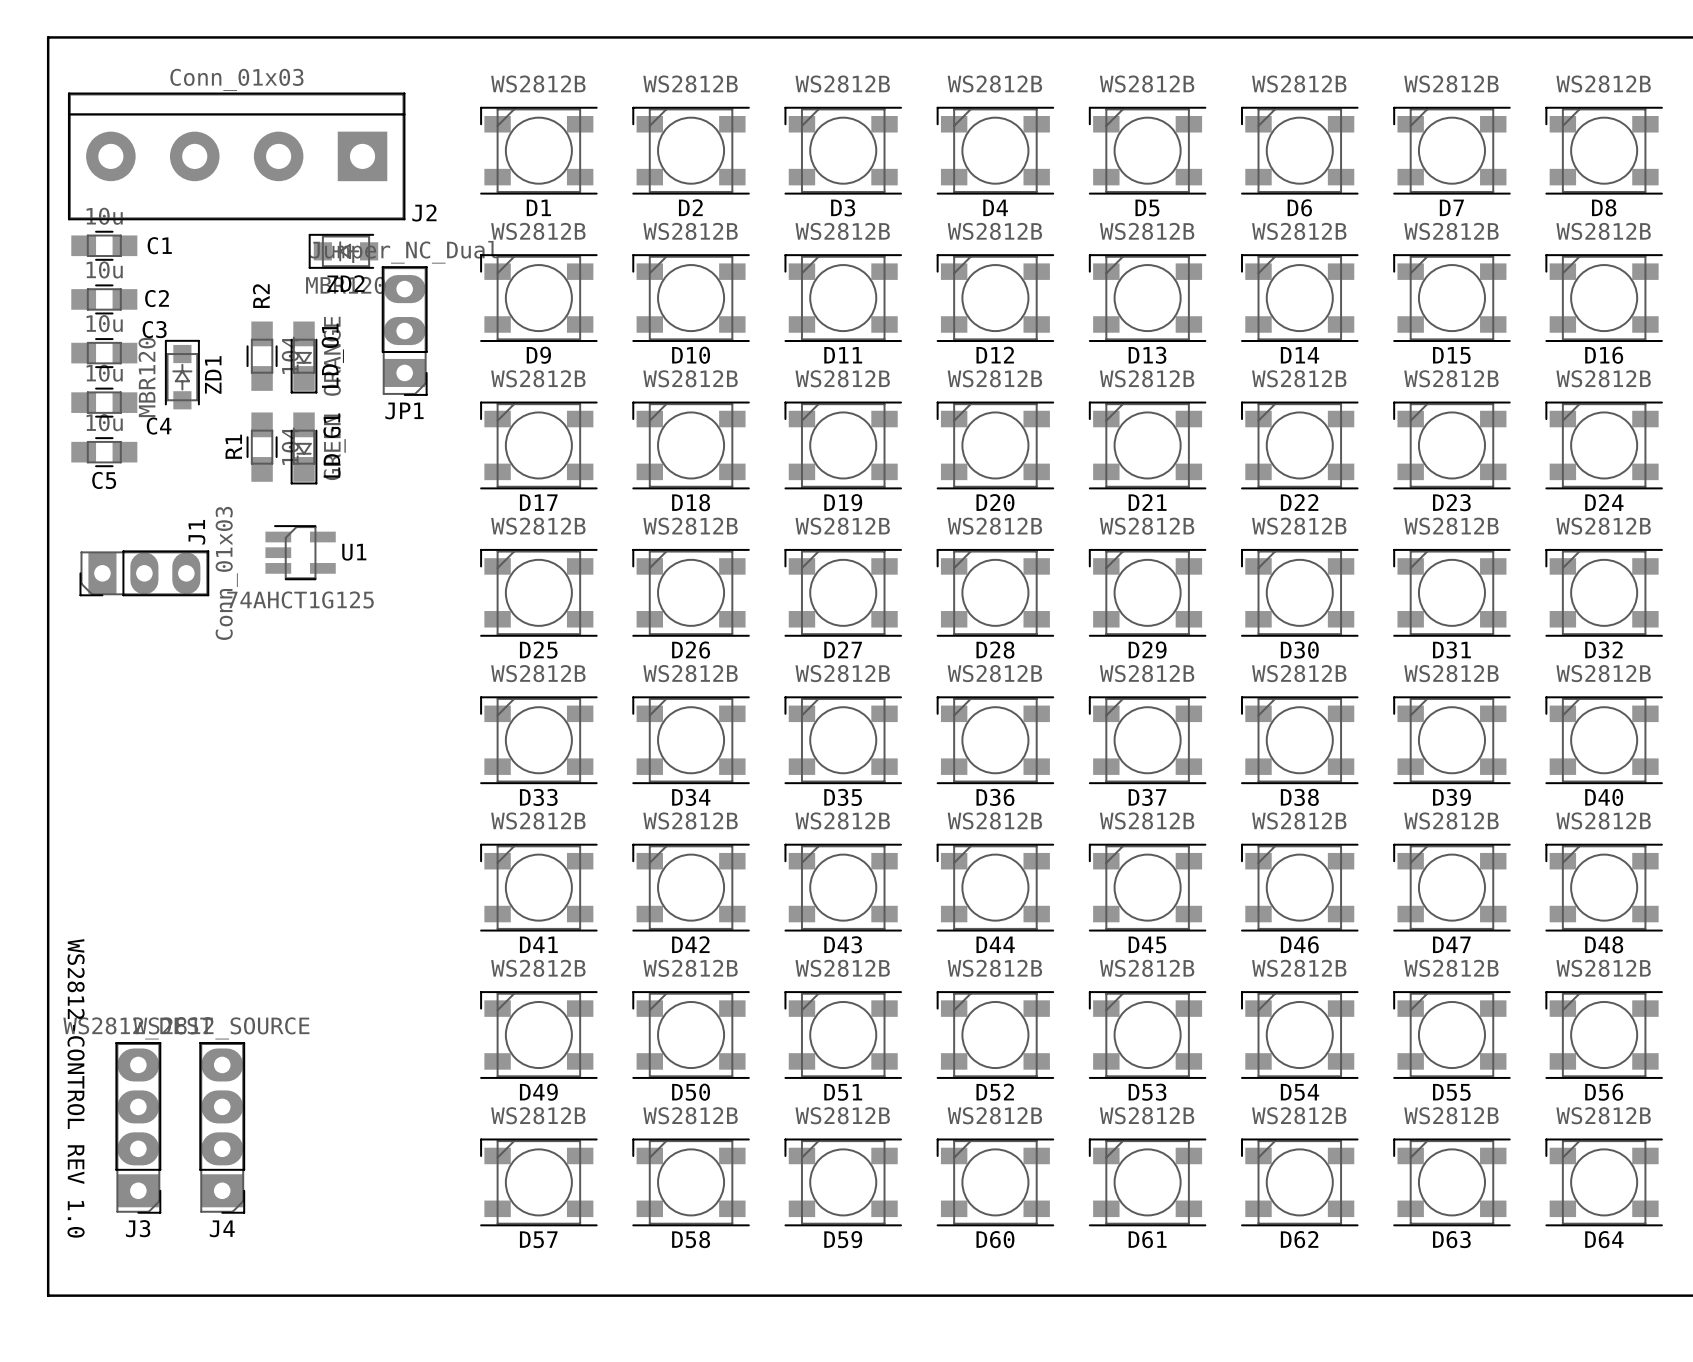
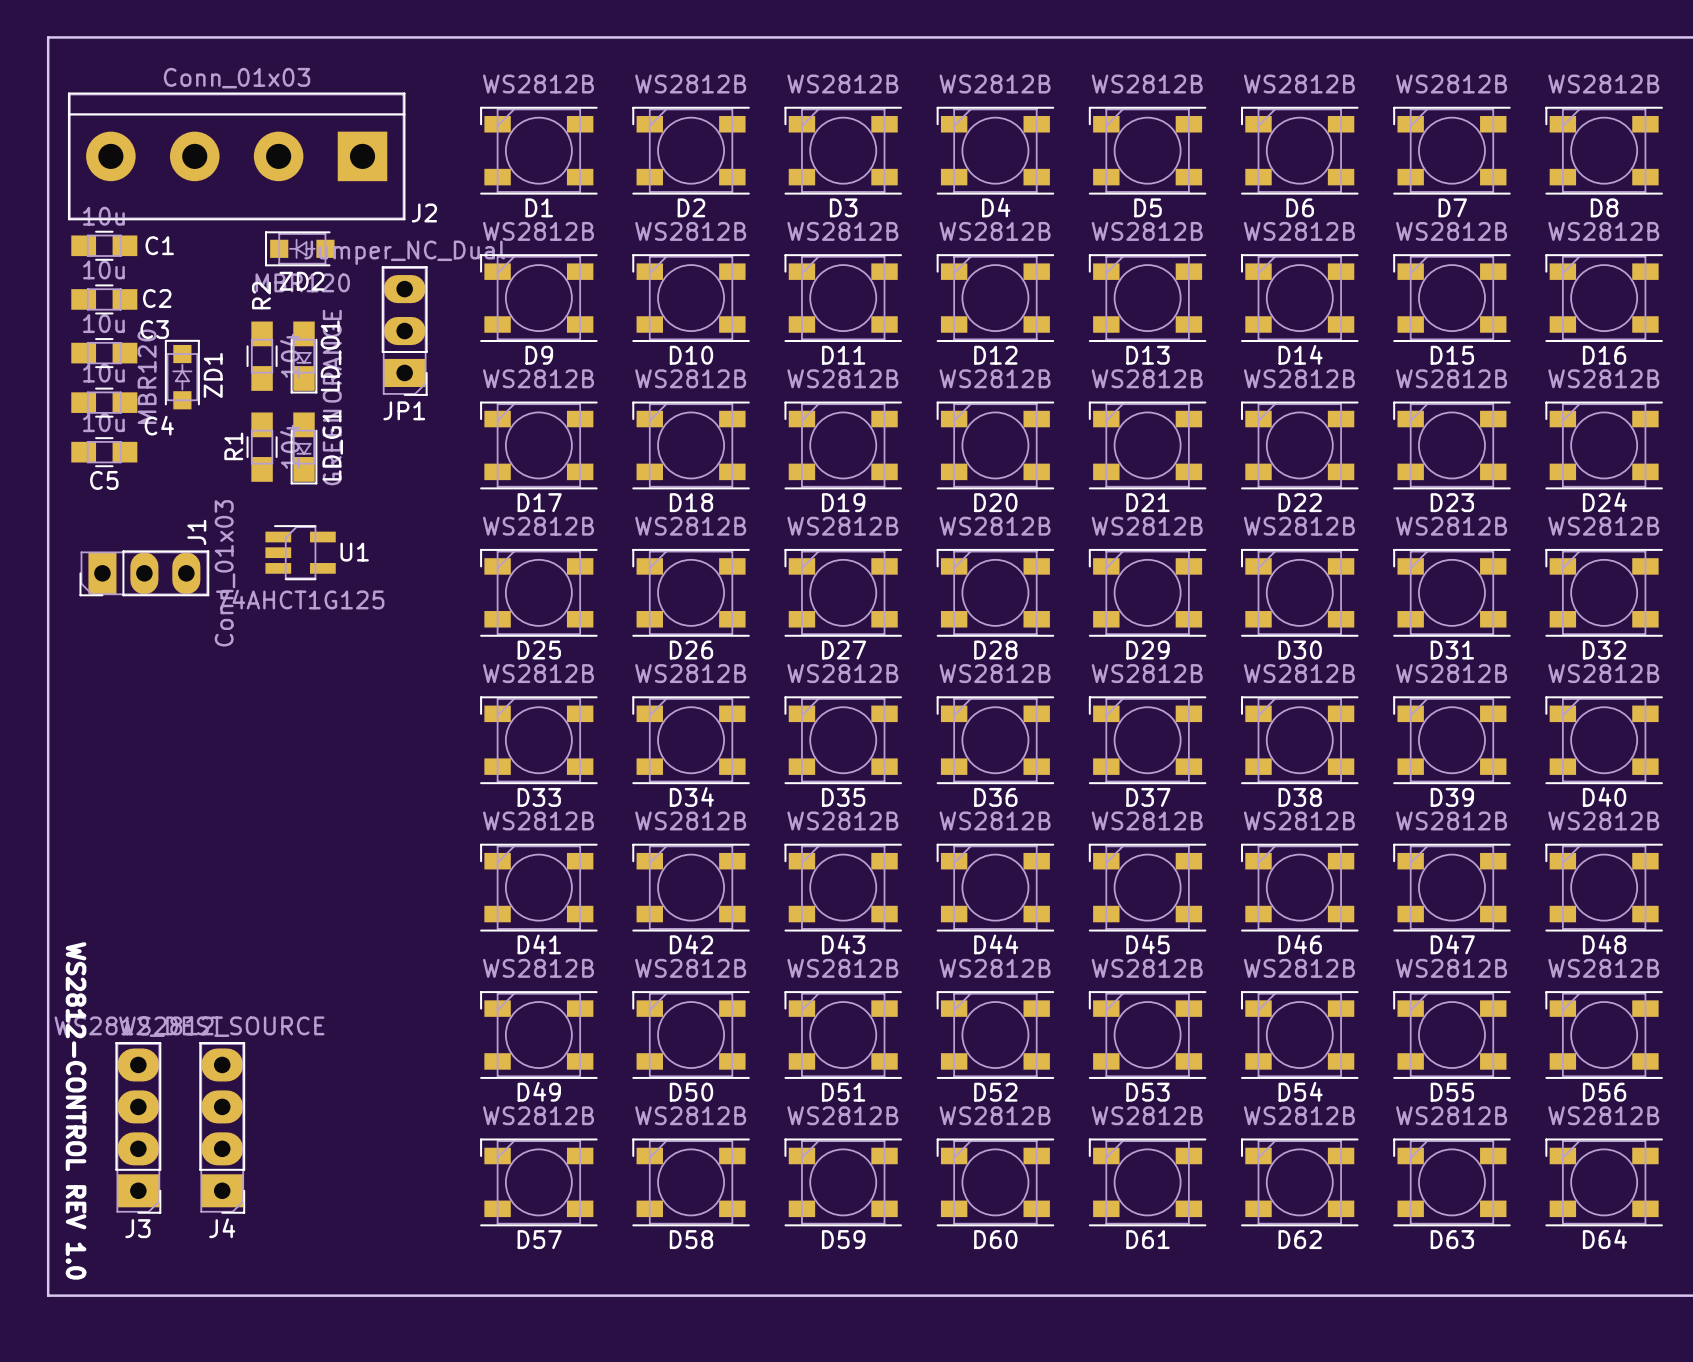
ZD2 position: (343, 251) -> (299, 248)

